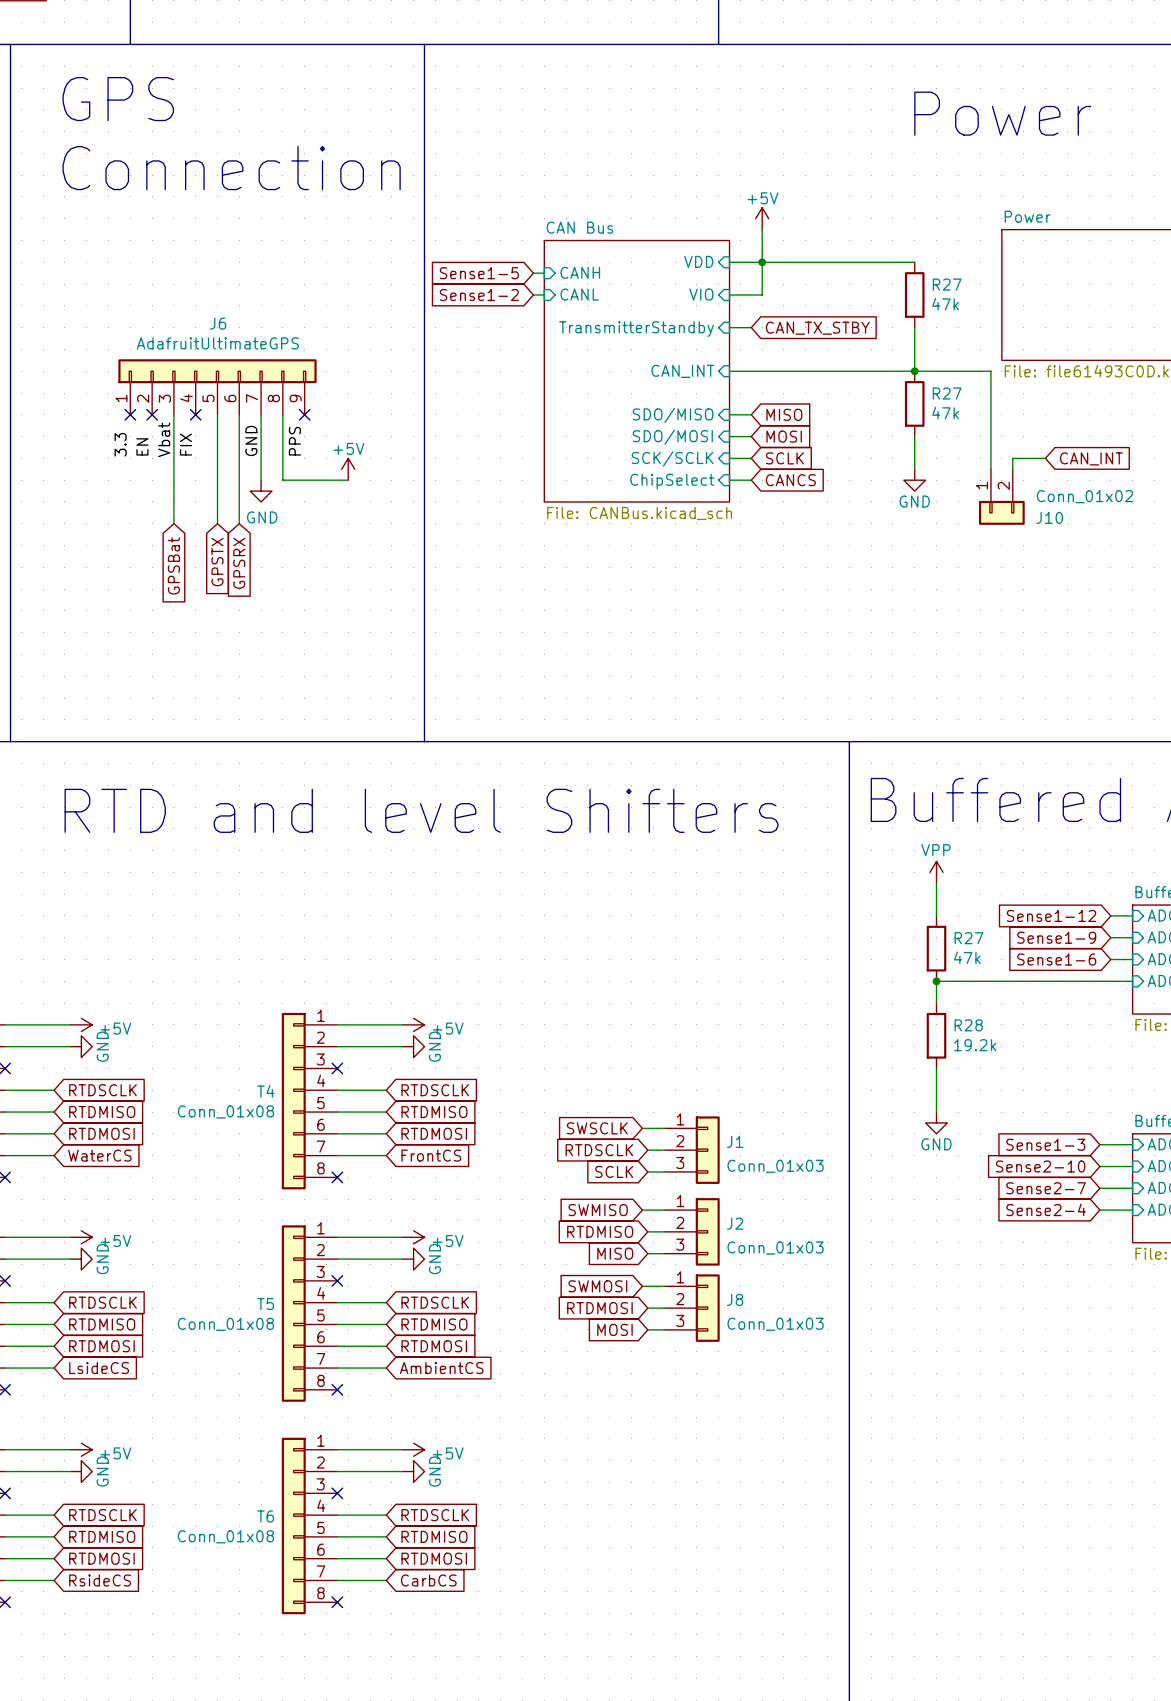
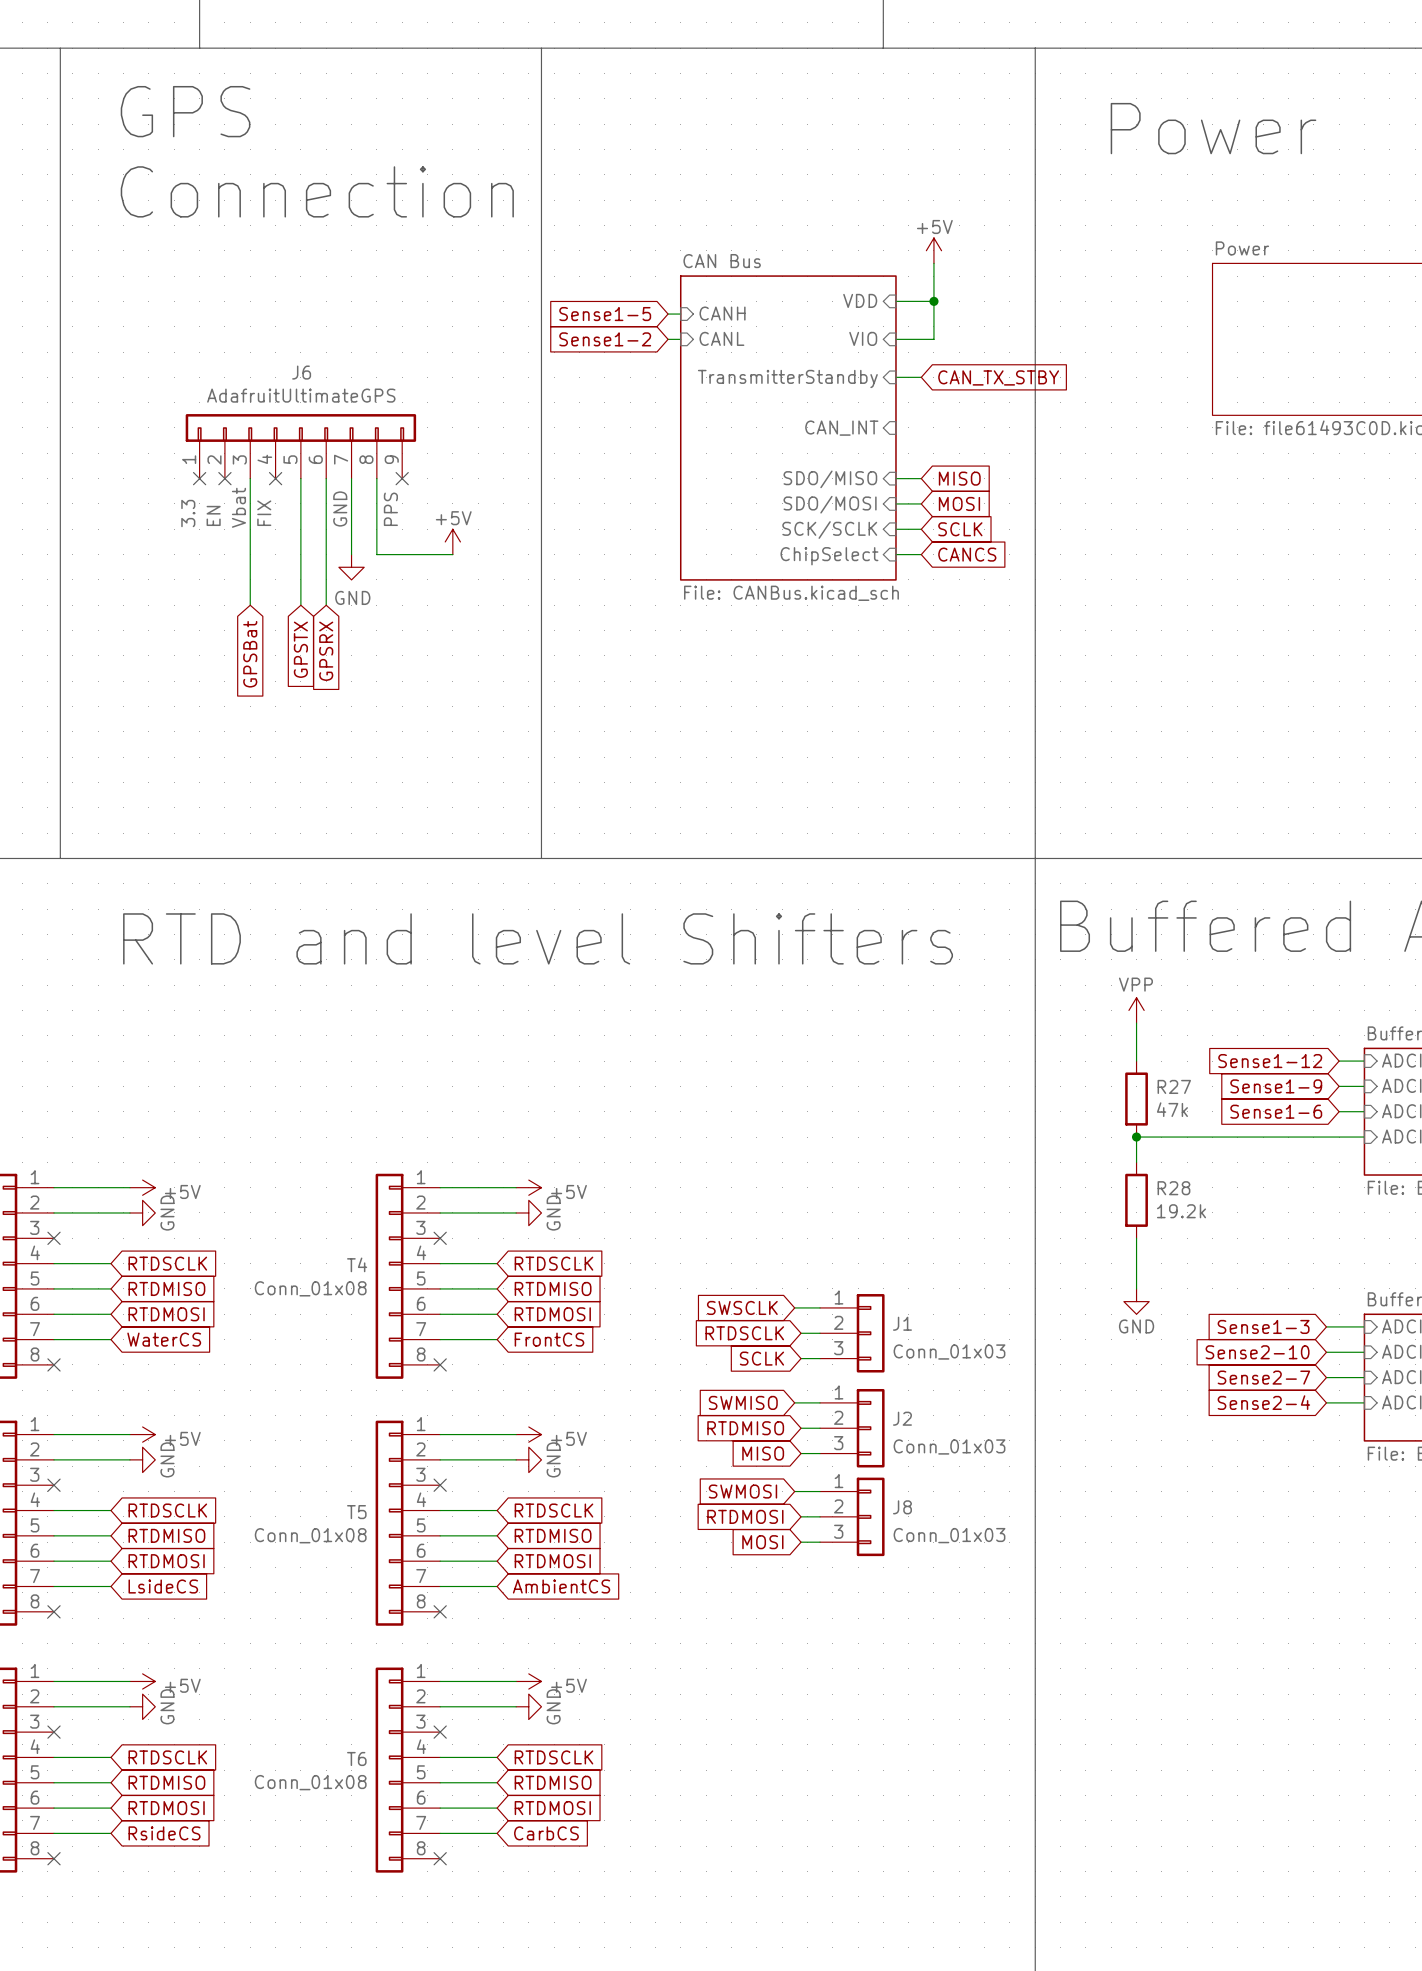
line: none -> (1035, 48) (1035, 858)
wire: (762, 262) (914, 262) -> none
R27: 47k (914, 294) -> none
wire: (914, 327) (914, 371) -> none
wire: (729, 371) (990, 371) (990, 469) -> none
junction: (914, 371) -> none
R27: 47k (914, 403) -> none
wire: (914, 436) (914, 469) -> none
wire: (1045, 458) (1012, 458) (1012, 469) -> none
global label: CAN_INT (1091, 458) -> none
power symbol: GND (914, 480) -> none
J10: Conn_01x02 (1001, 497) -> none

